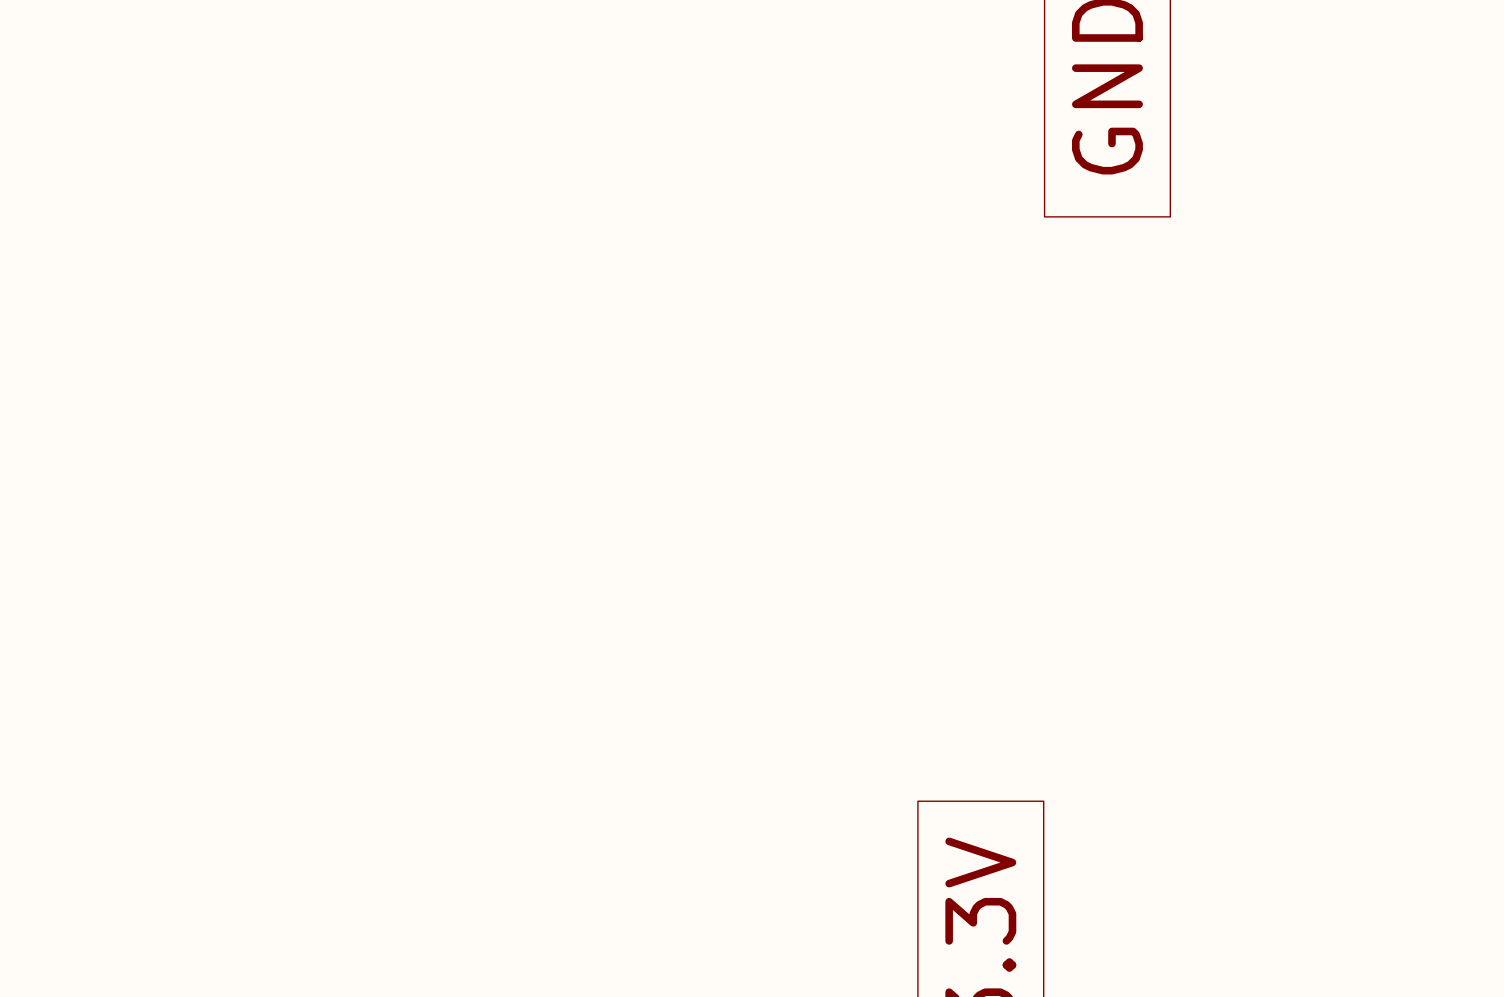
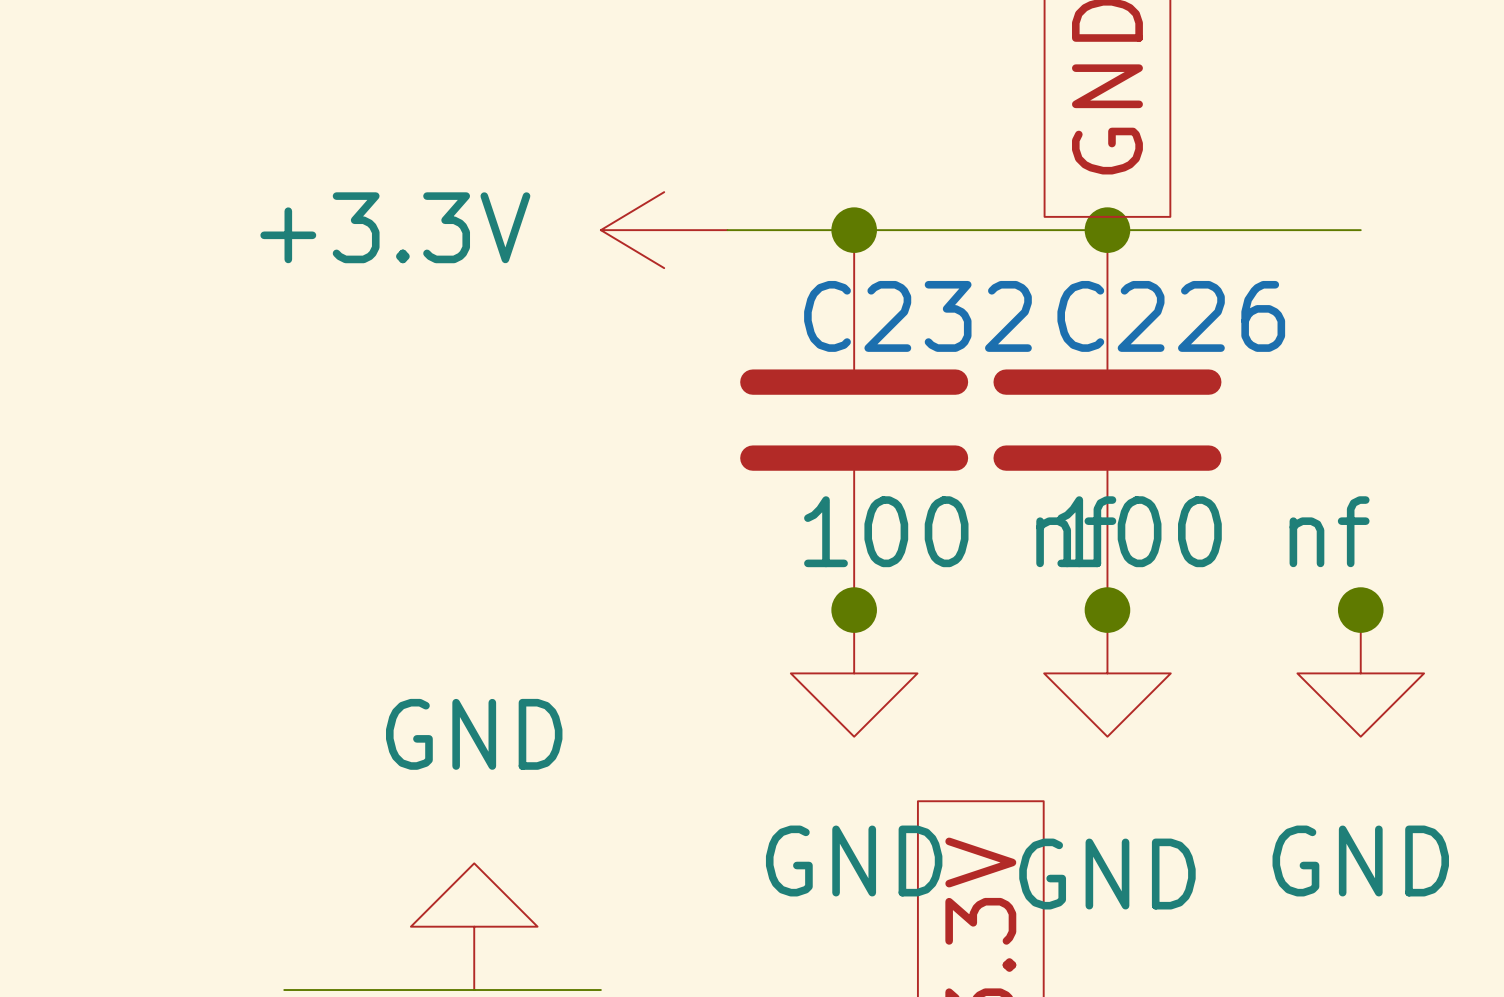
power symbol: none -> +3.3V (664, 230)
wire: none -> (727, 230) (1360, 230)
junction: none -> (854, 230)
junction: none -> (1107, 230)
C232: none -> 100 nf (854, 420)
C226: none -> 100 nf (1107, 420)
junction: none -> (854, 610)
junction: none -> (1107, 610)
junction: none -> (1360, 610)
power symbol: none -> GND (854, 673)
power symbol: none -> GND (1107, 673)
power symbol: none -> GND (1360, 673)
power symbol: none -> GND (474, 926)
wire: none -> (284, 990) (600, 990)

